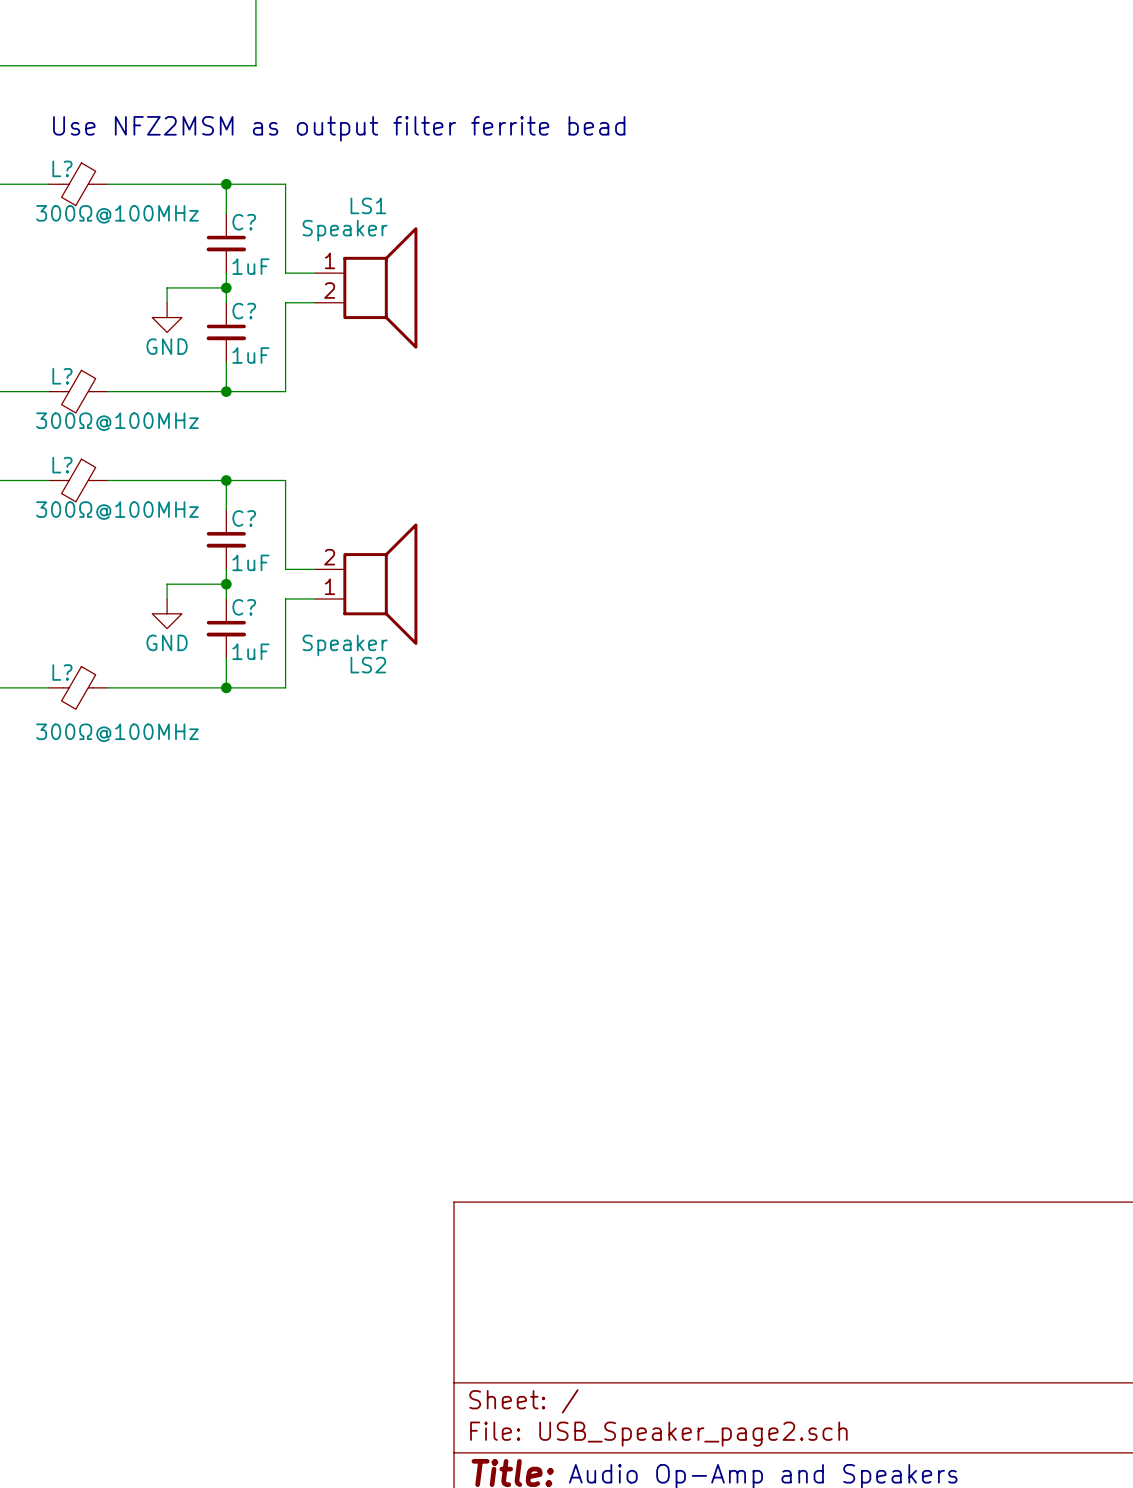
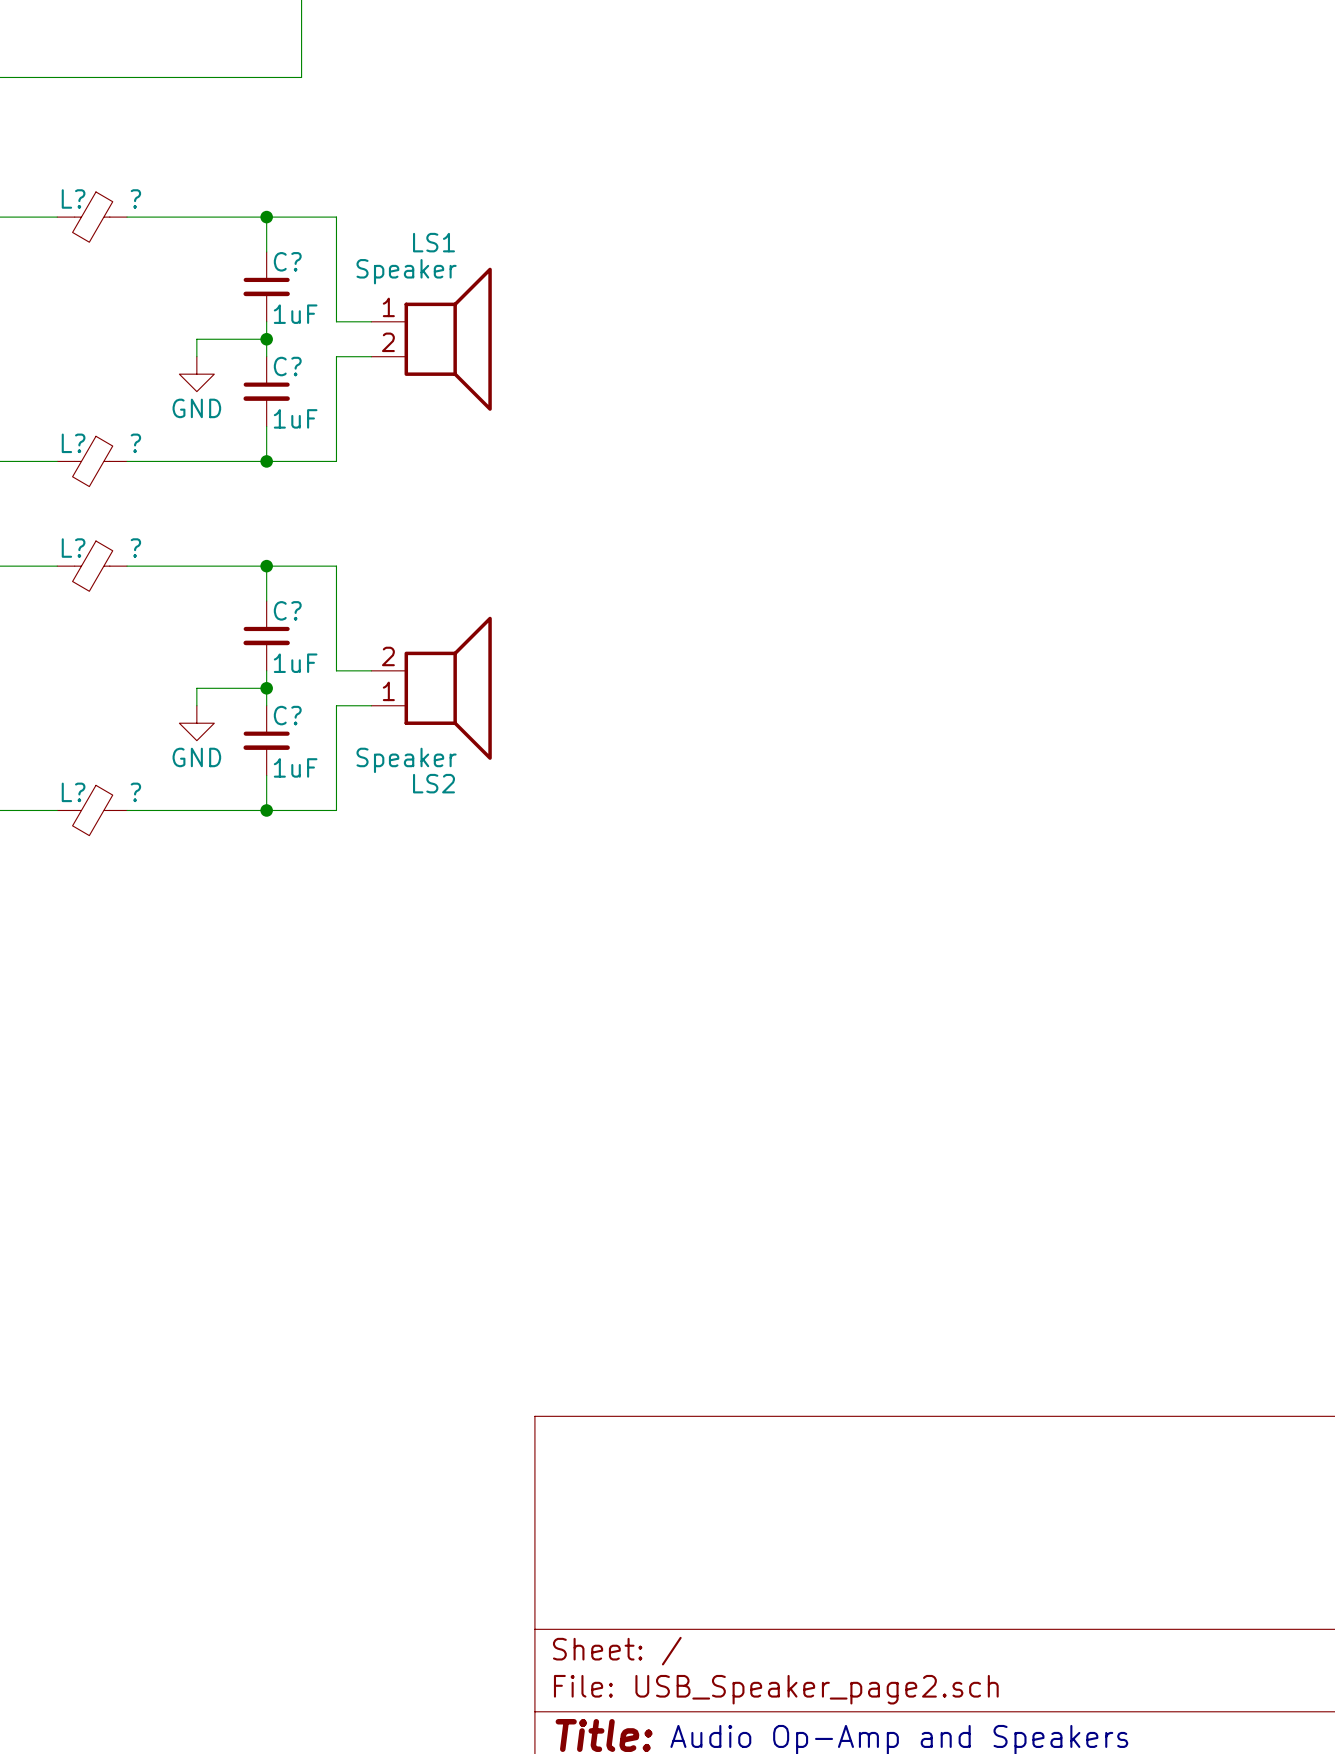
text: Use NFZ2MSM as output filter ferrite bead (339, 128) -> none
L? value: 300Ω@100MHz (117, 214) -> ? (135, 198)
L? value: 300Ω@100MHz (117, 421) -> ? (135, 443)
L? value: 300Ω@100MHz (117, 510) -> ? (135, 548)
L? value: 300Ω@100MHz (117, 732) -> ? (135, 792)

